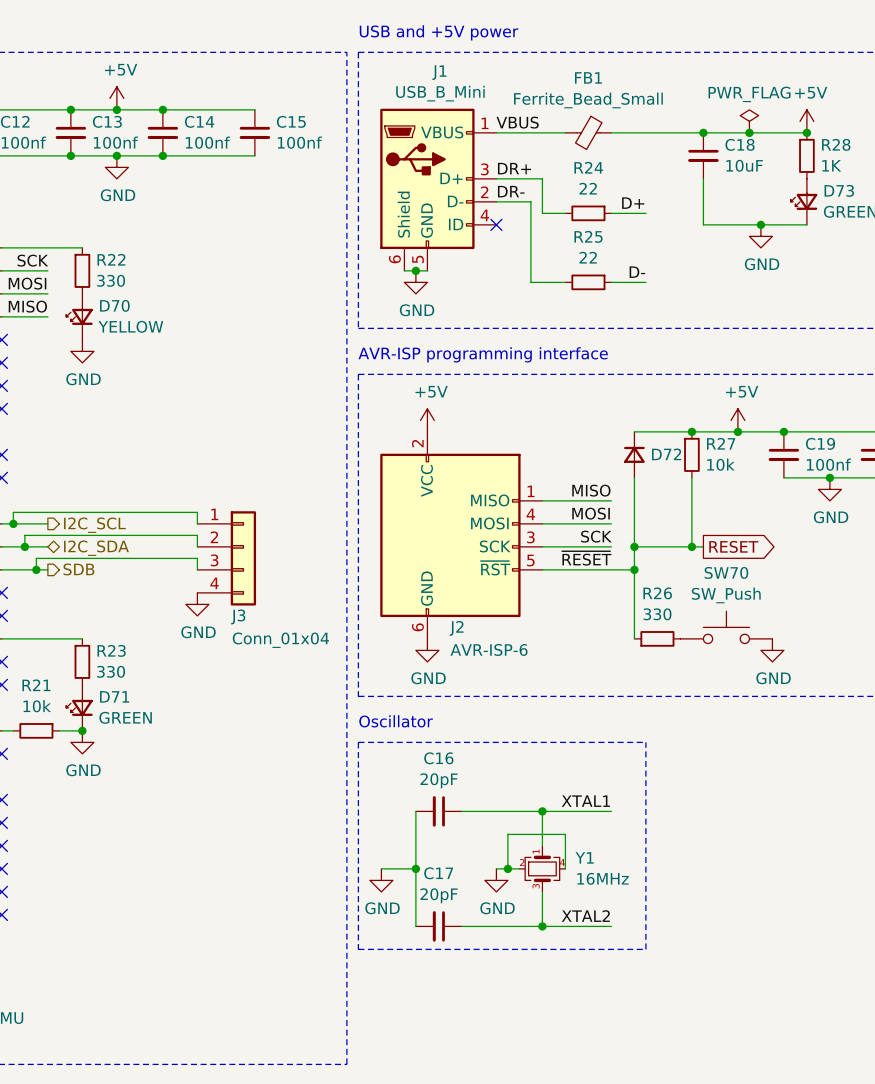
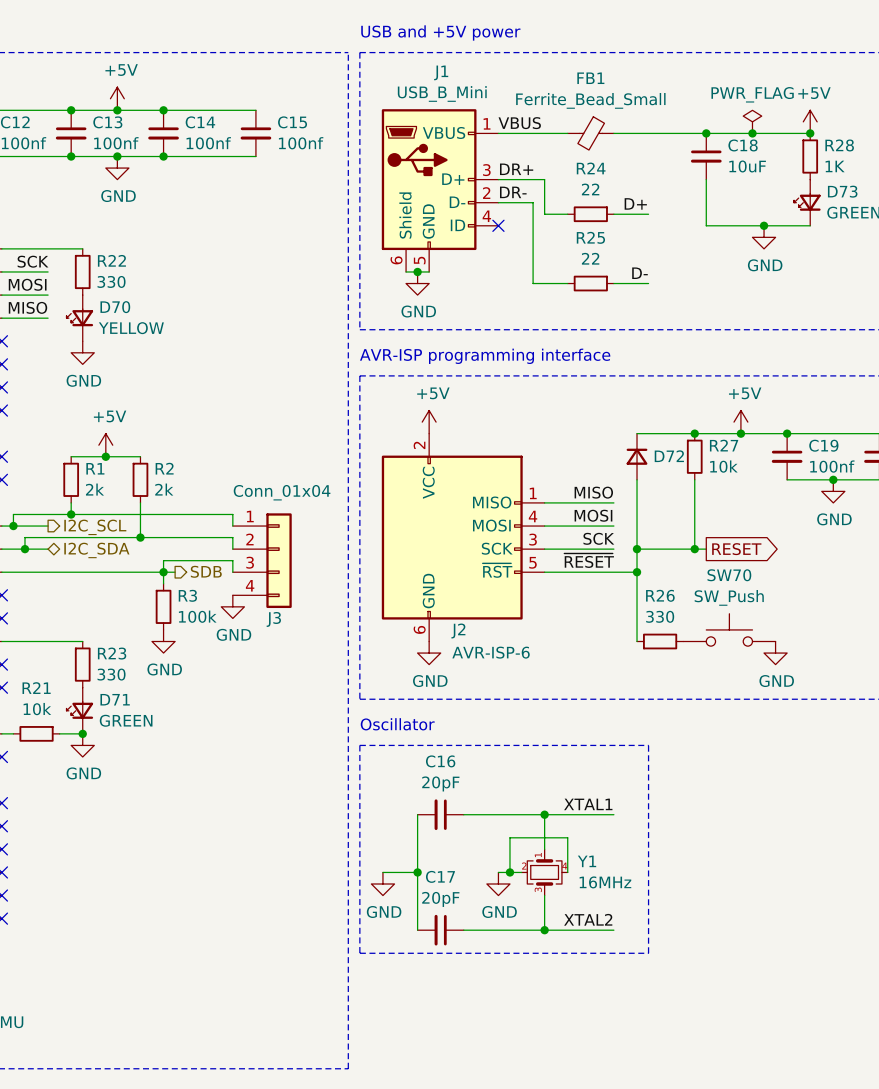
power symbol: none -> +5V (105, 445)
wire: none -> (71, 456) (140, 456)
junction: none -> (105, 456)
R1: none -> 2k (71, 479)
R2: none -> 2k (140, 479)
wire: none -> (71, 502) (71, 514)
wire: none -> (140, 502) (140, 537)
junction: none -> (71, 514)
wire: (197, 512) (197, 523) -> (198, 514) (232, 514) (232, 526)
junction: none -> (140, 537)
wire: (197, 535) (197, 546) -> (198, 537) (232, 537) (232, 549)
wire: (162, 558) (36, 558) (36, 569) -> (163, 560) (163, 583)
wire: (197, 558) (197, 569) -> (198, 560) (232, 560) (232, 572)
J3 position: (226, 558) -> (262, 560)
junction: (36, 569) -> none
wire: none -> (48, 572) (175, 572)
hierarchical label position: SDB (78, 569) -> SDB (206, 571)
junction: none -> (163, 572)
R3: none -> 100k (163, 606)
power symbol: GND (197, 604) -> none
power symbol: none -> GND (232, 606)
power symbol: none -> GND (163, 641)
J3 value position: Conn_01x04 (280, 640) -> Conn_01x04 (282, 492)

